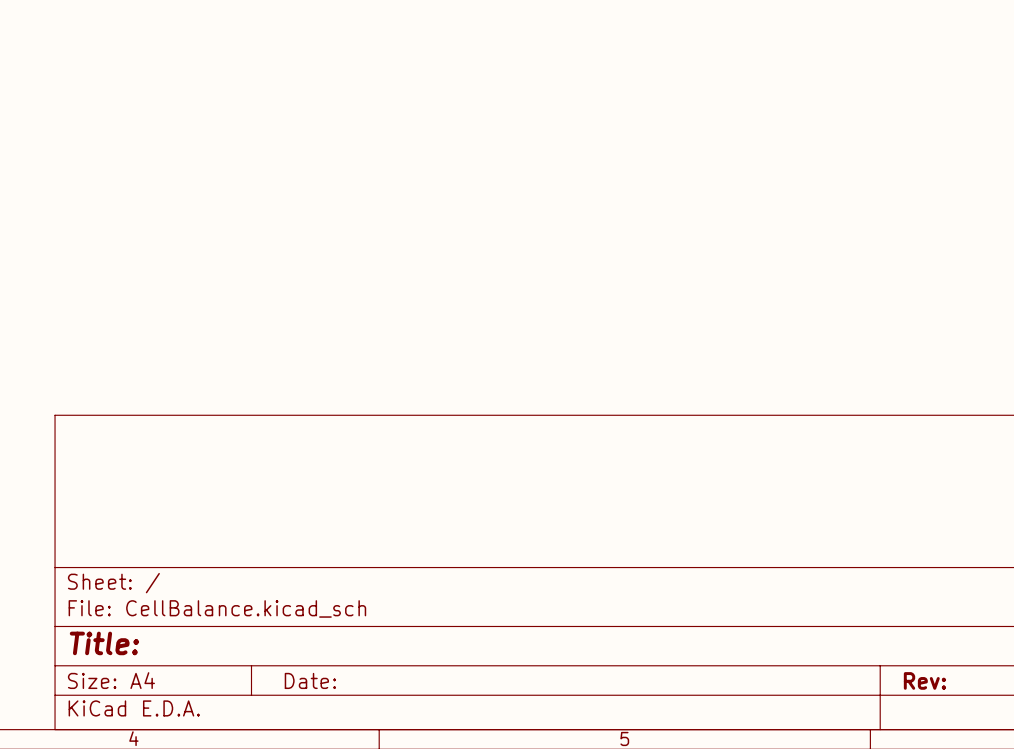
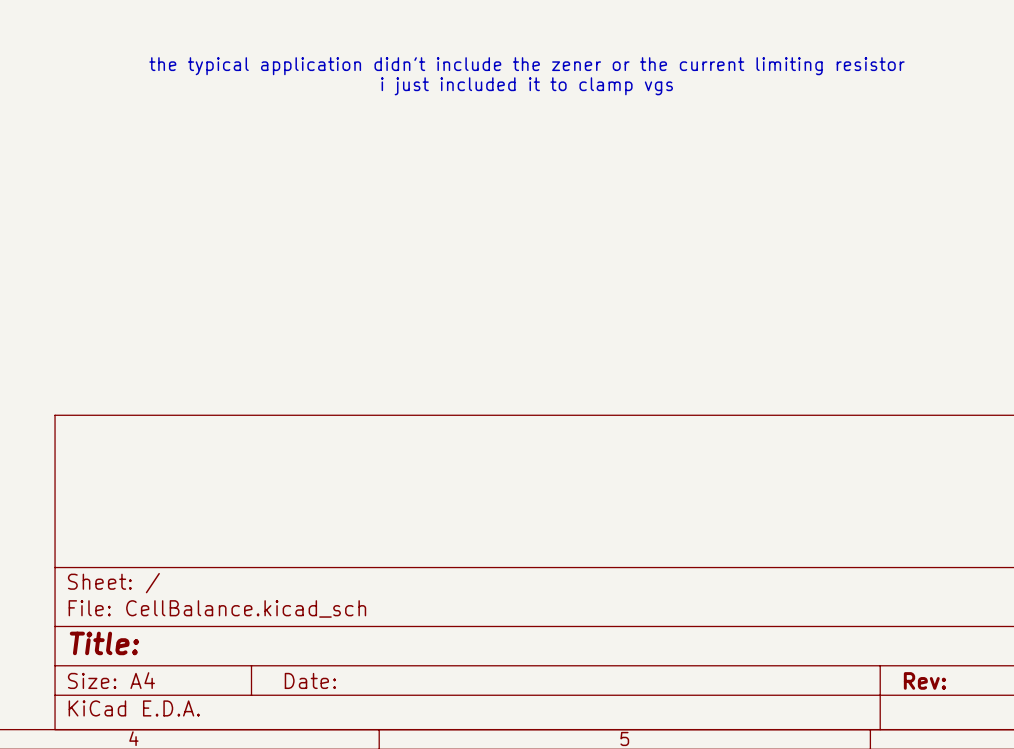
text: none -> the typical application didn't include the zener or the current limiting resistor (526, 66)
text: none -> i just included it to clamp vgs (526, 86)

